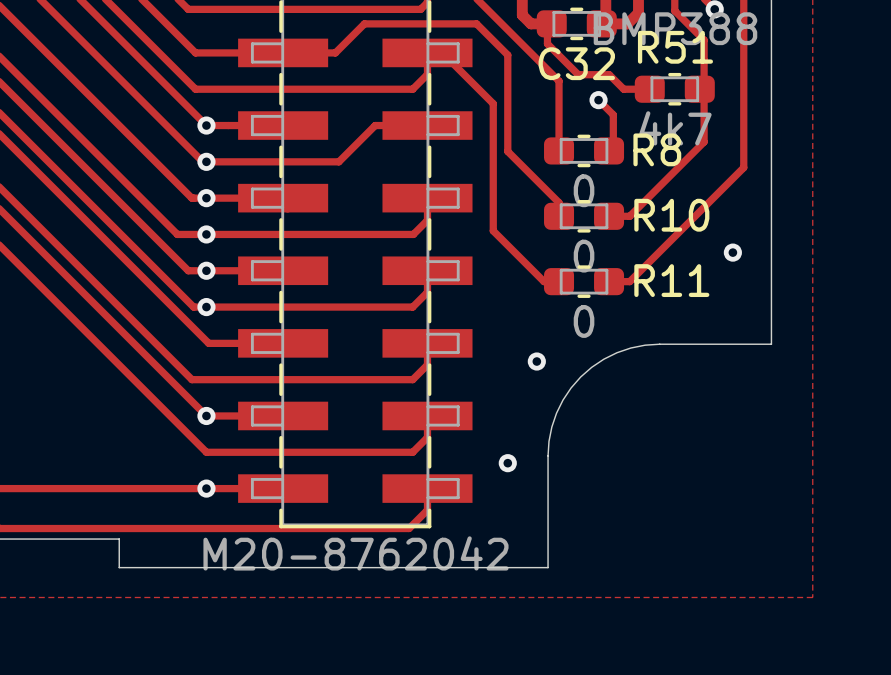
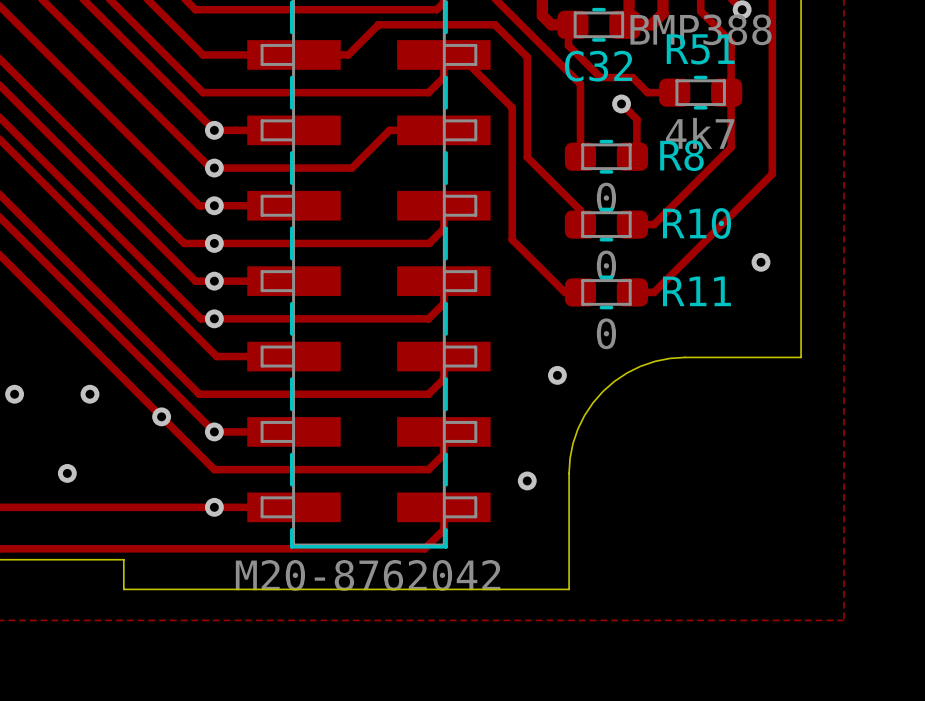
via: none -> (14, 394)
via: none -> (89, 394)
via: none -> (161, 416)
via: none -> (67, 473)

